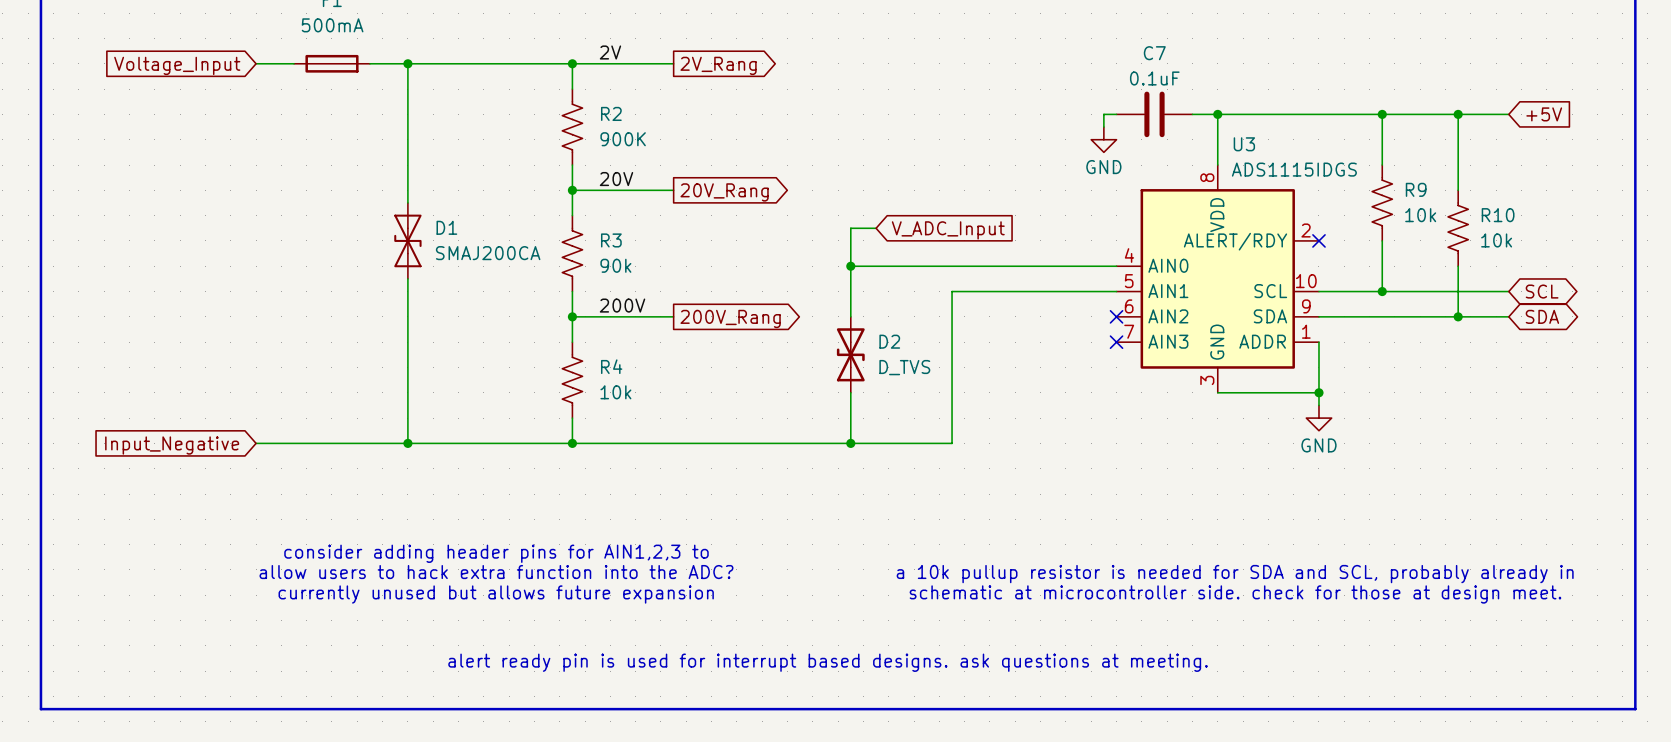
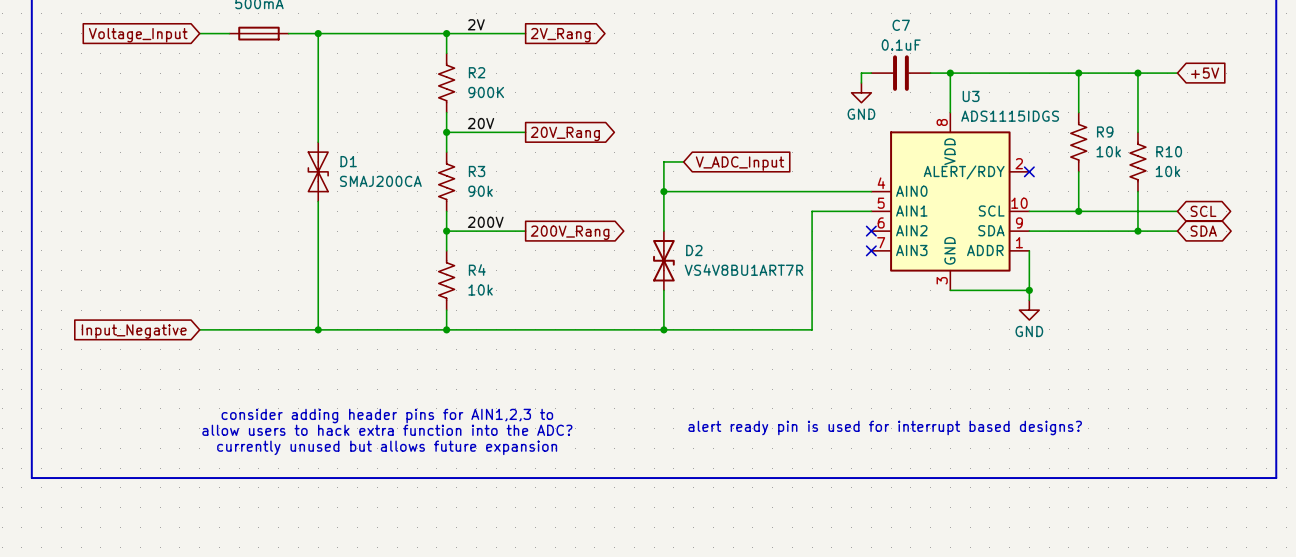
wire: (1040, 291) (952, 291) (952, 443) -> (812, 211) (812, 329) (742, 329)
D2 value: D_TVS (904, 367) -> VS4V8BU1ART7R (743, 270)
text: none -> alert ready pin is used for interrupt based designs? (885, 427)
text: a 10k pullup resistor is needed for SDA and SCL, probably already in (1235, 574) -> none
text: schematic at microcontroller side. check for those at design meet. (1235, 594) -> none
line: (40, 633) (40, 709) (1635, 709) (1635, 633) -> (31, 478) (1276, 478)
text: alert ready pin is used for interrupt based designs. ask questions at meeting. (828, 662) -> none

